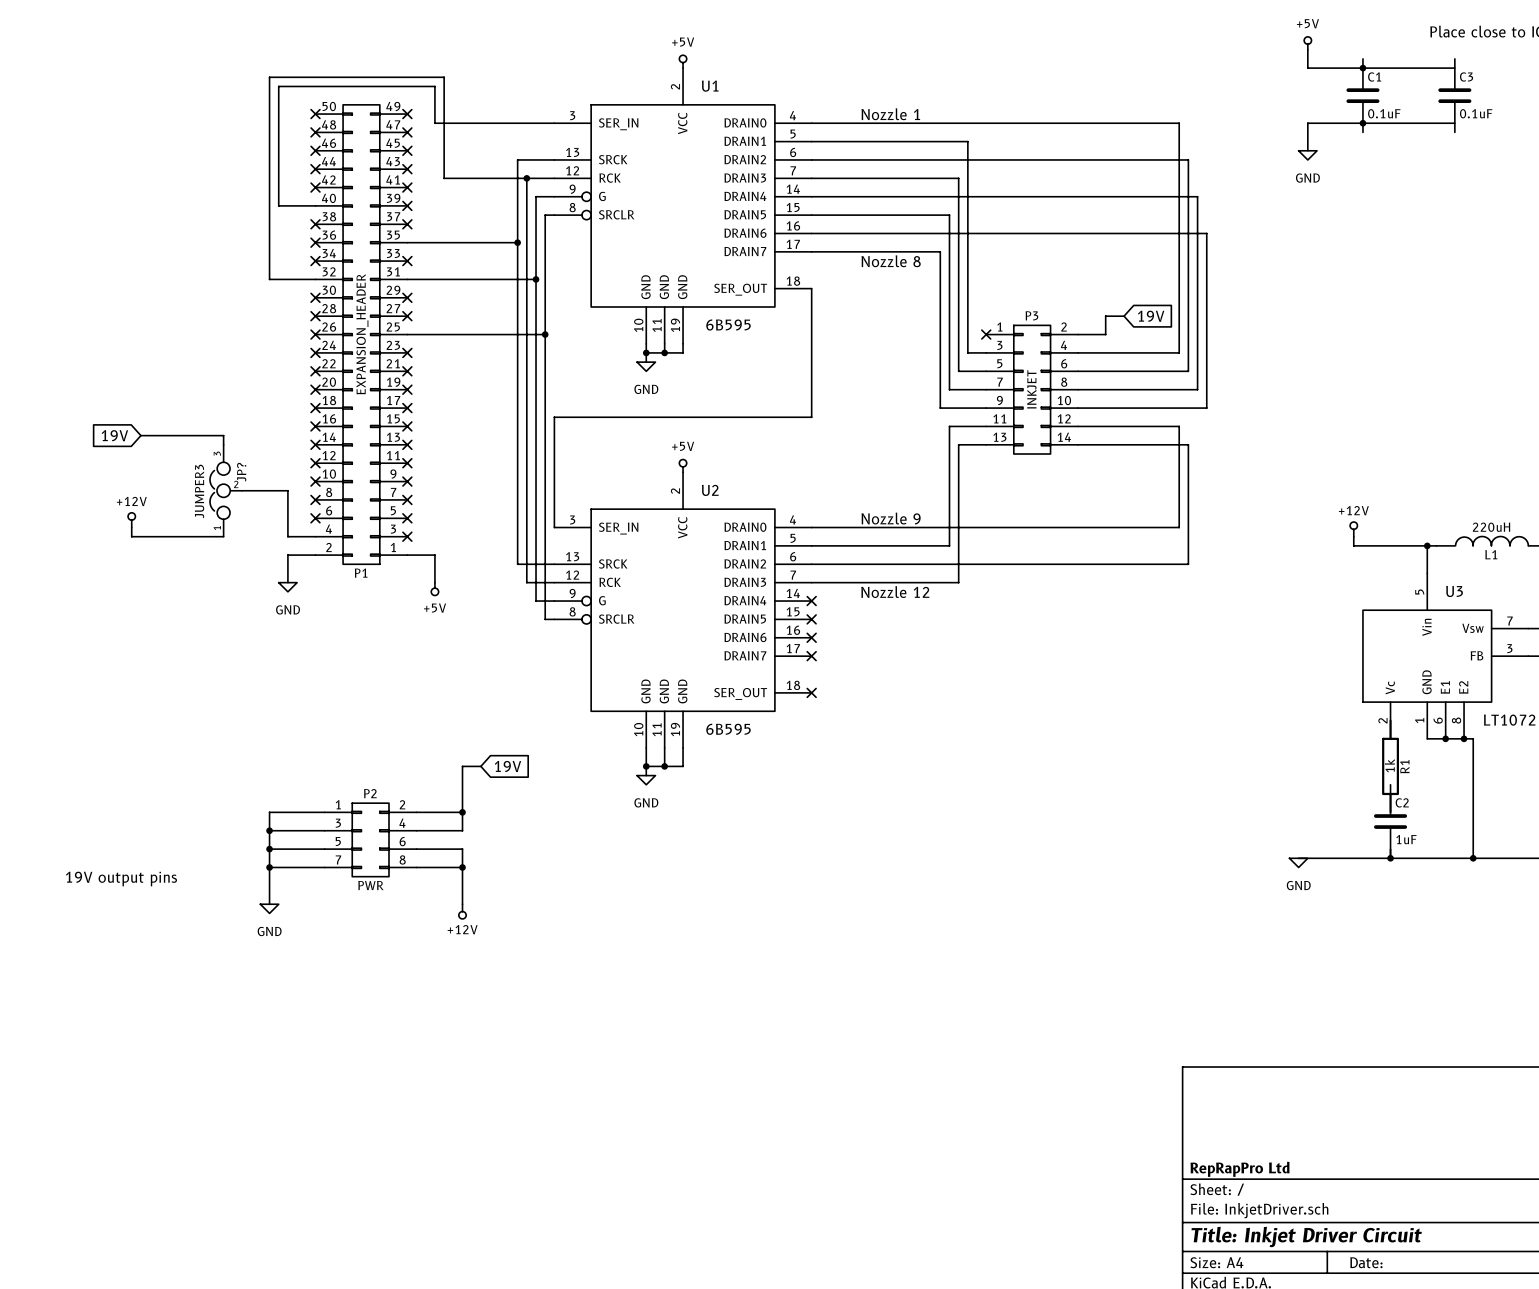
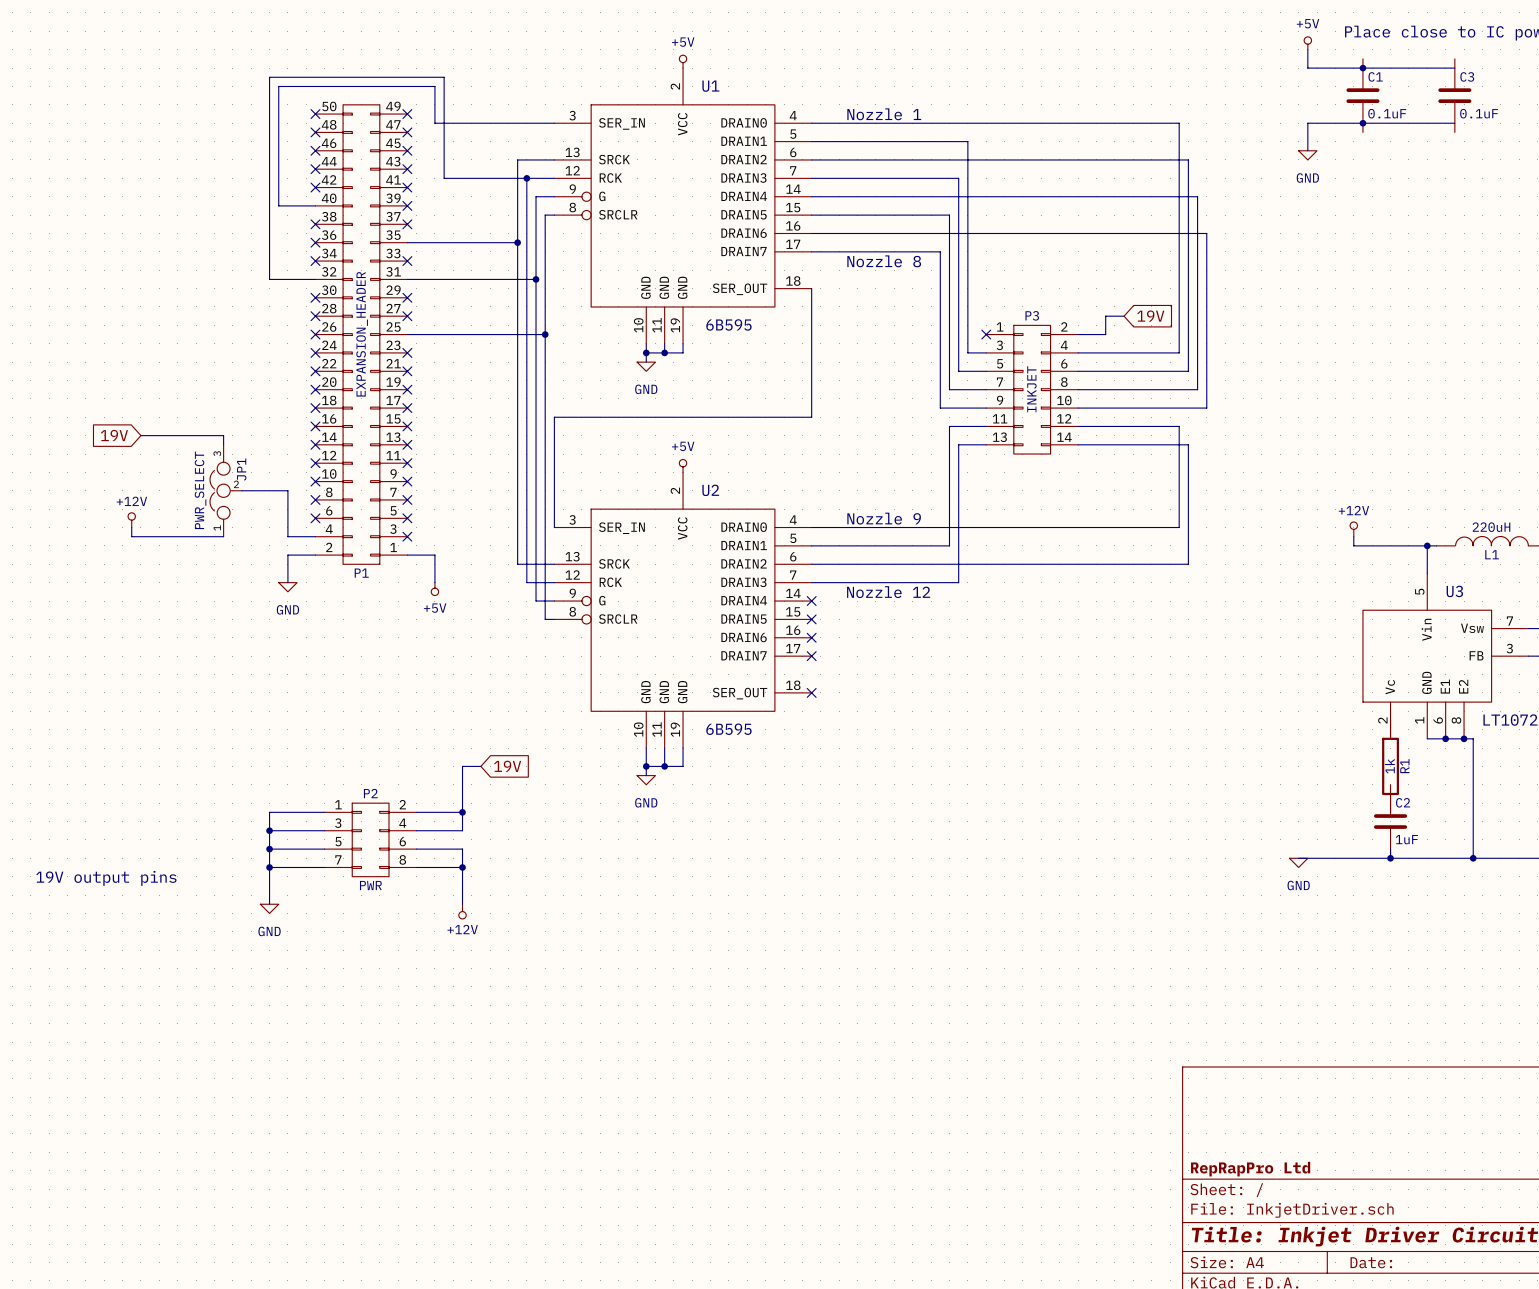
JP? name: JP? (241, 472) -> JP1 (241, 469)
JP? value: JUMPER3 (199, 491) -> PWR_SELECT (200, 490)

